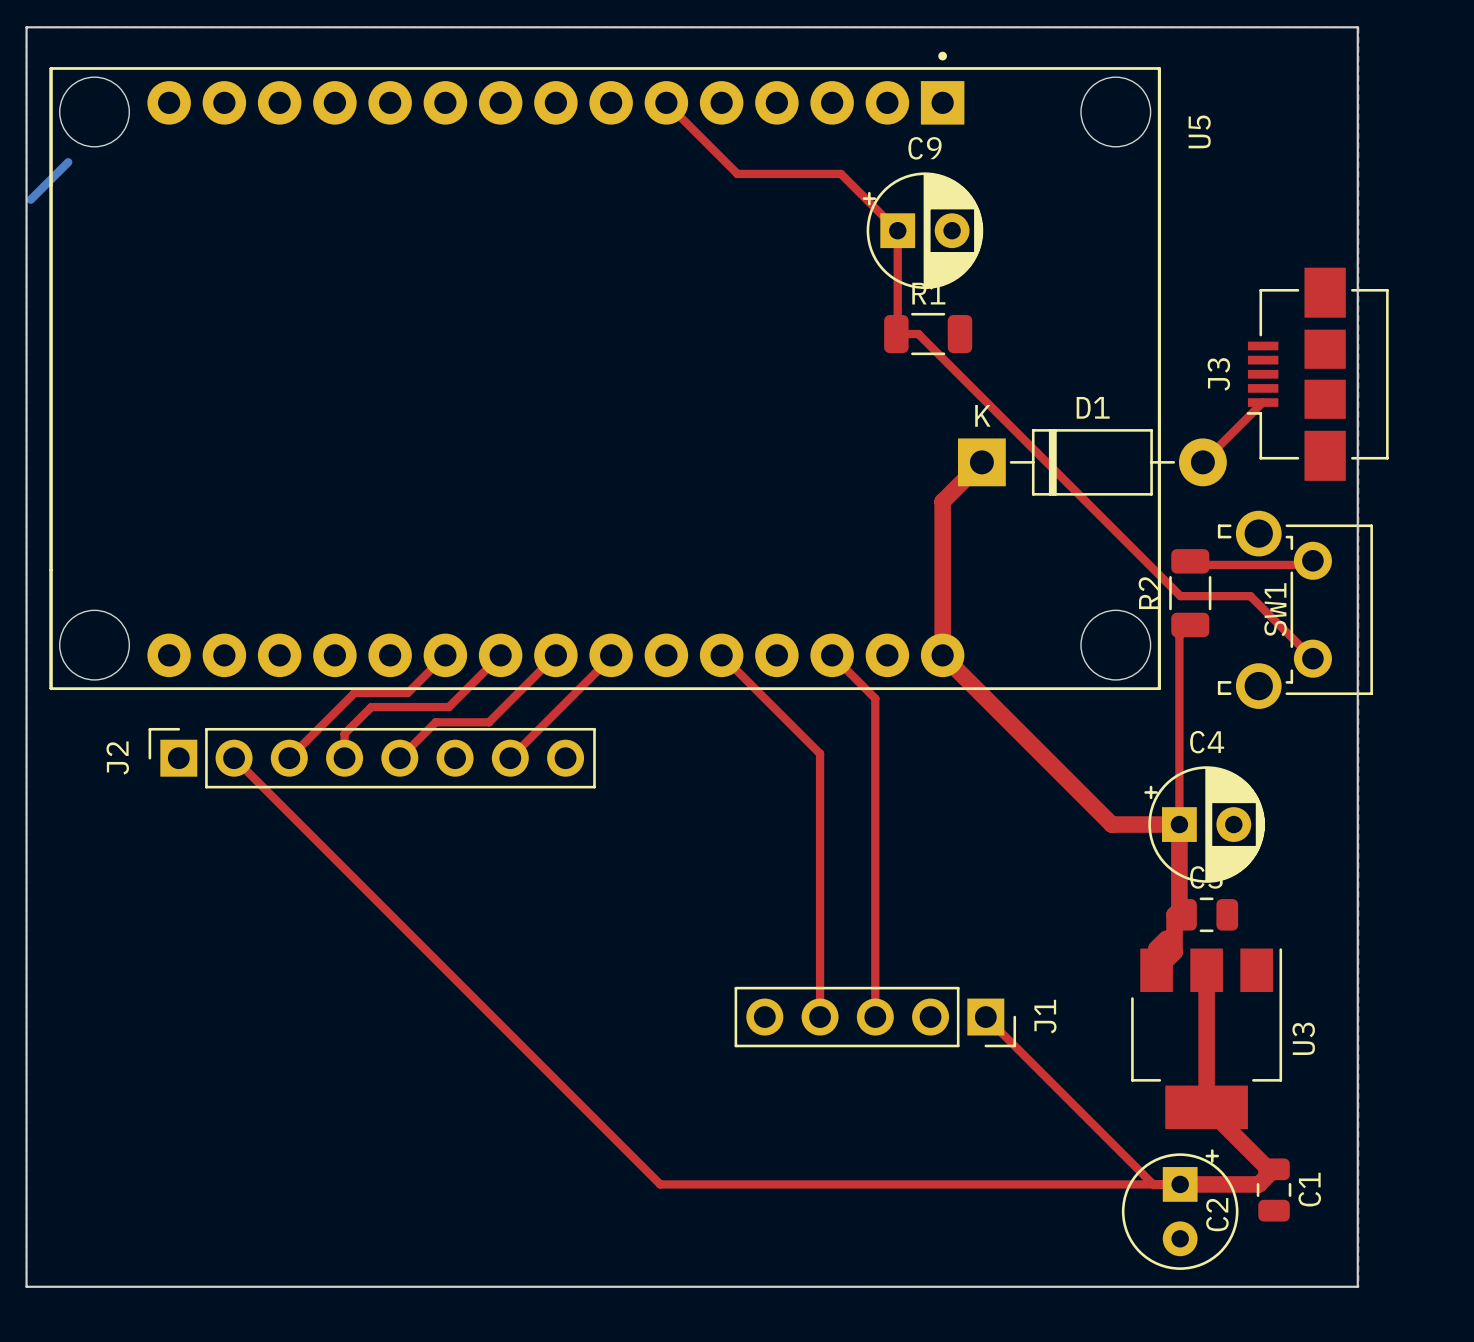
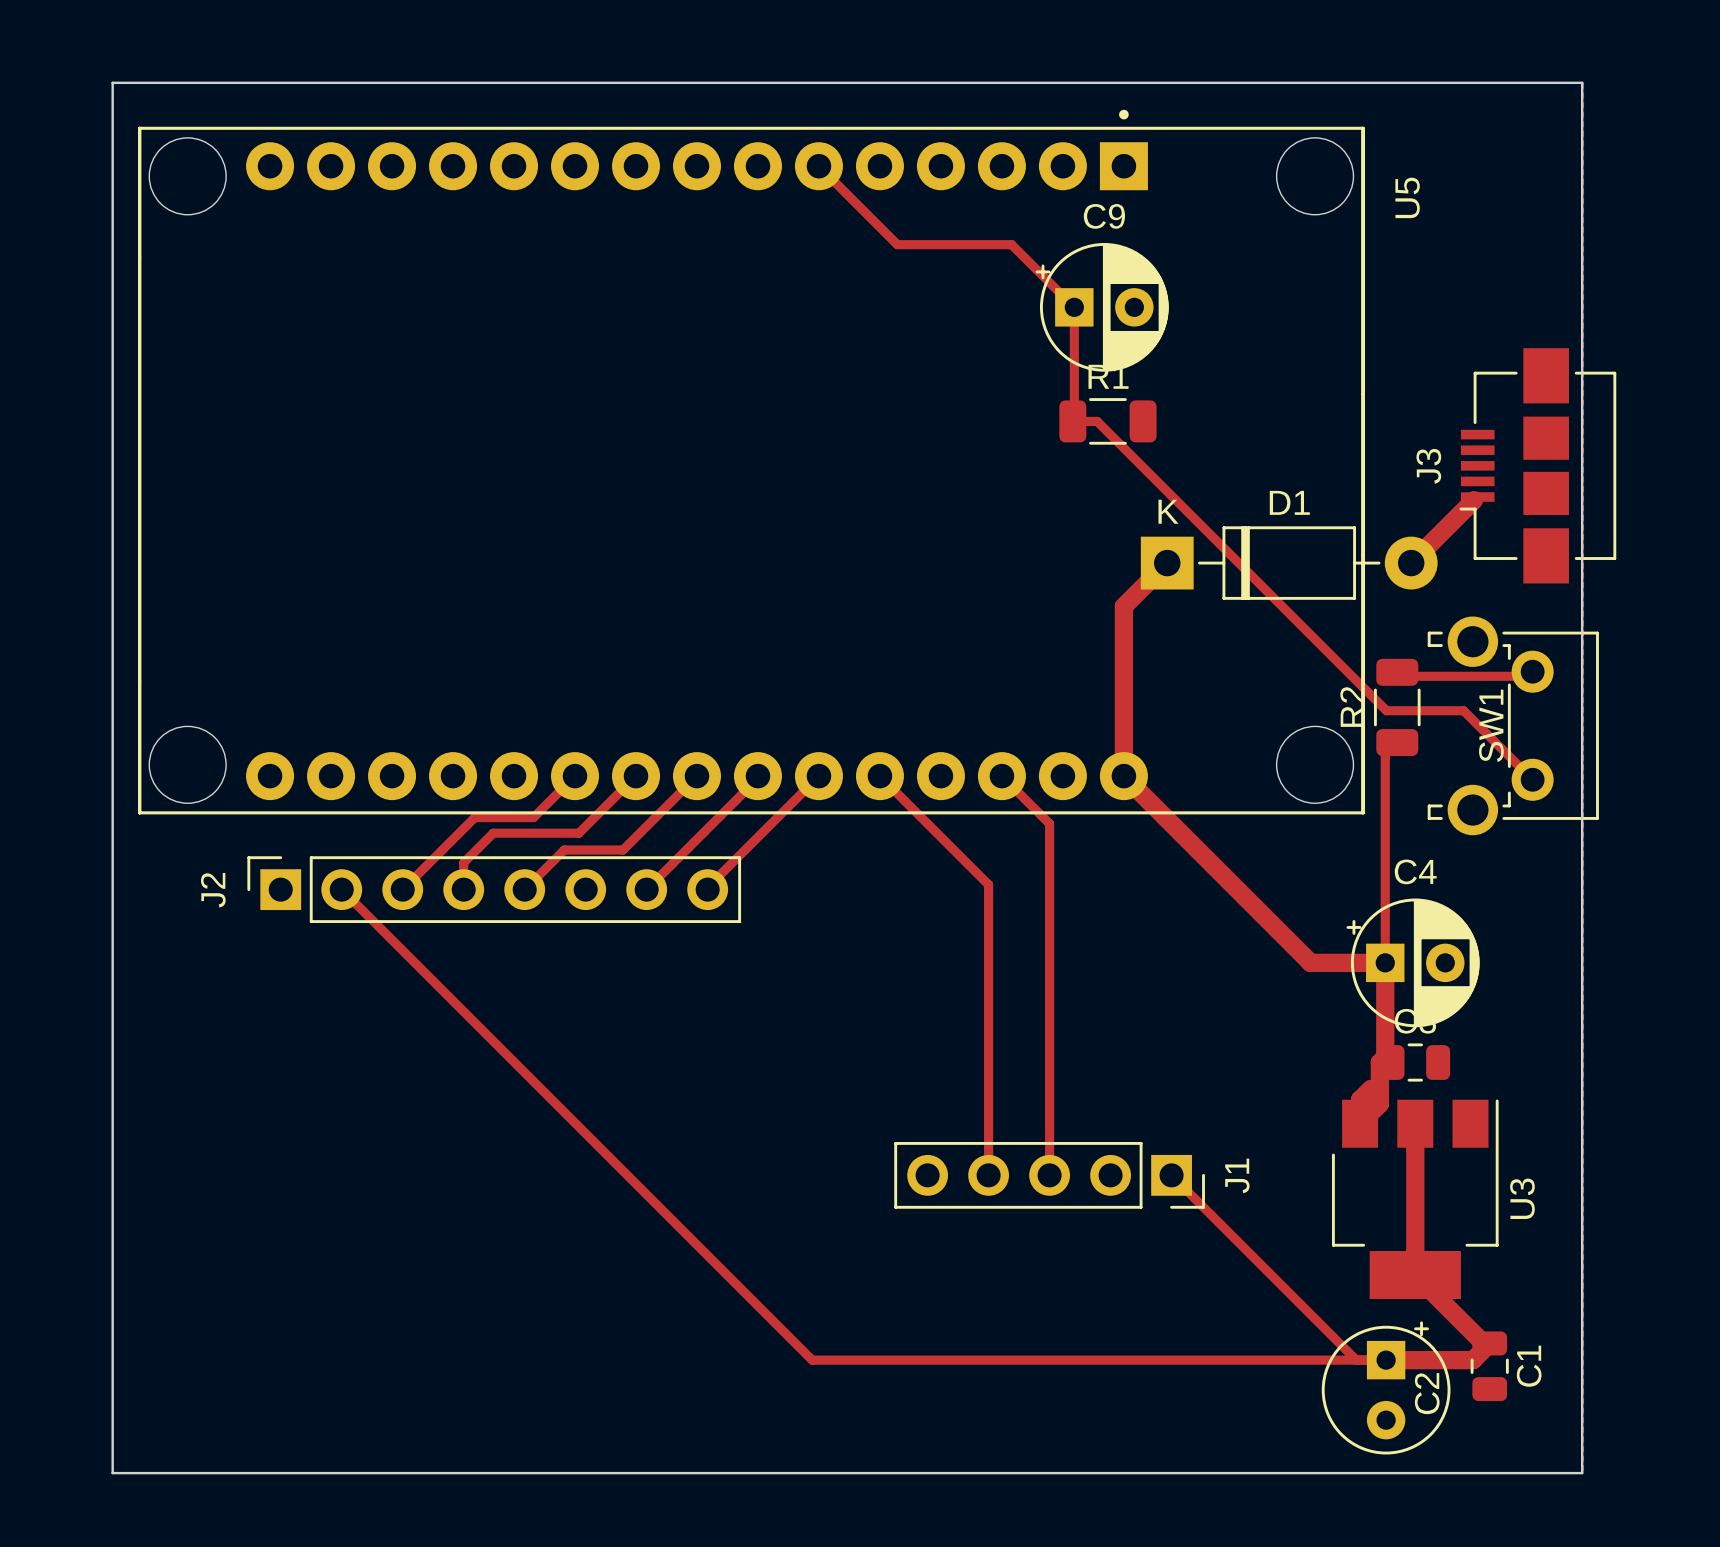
bottom track: (68, 162) (30, 199) -> none
top track width: thin (1259, 405) (1202, 462) -> thick (1474, 500) (1411, 563)
top track: none -> (818, 776) (707, 887) (707, 889)

